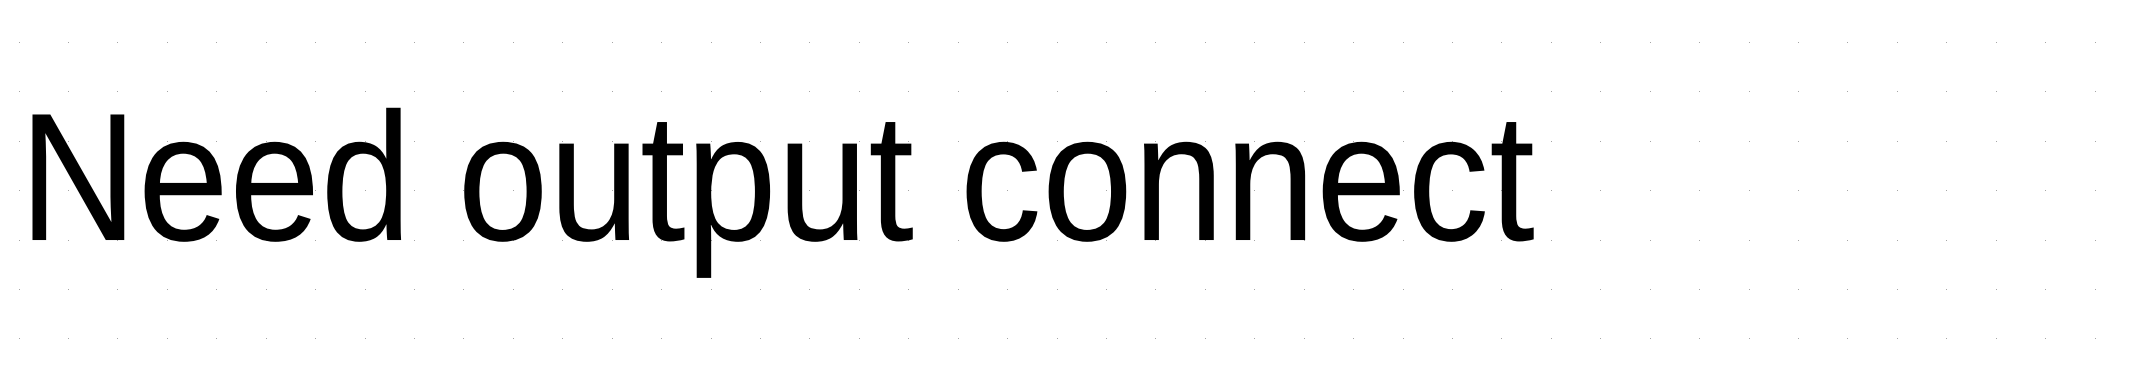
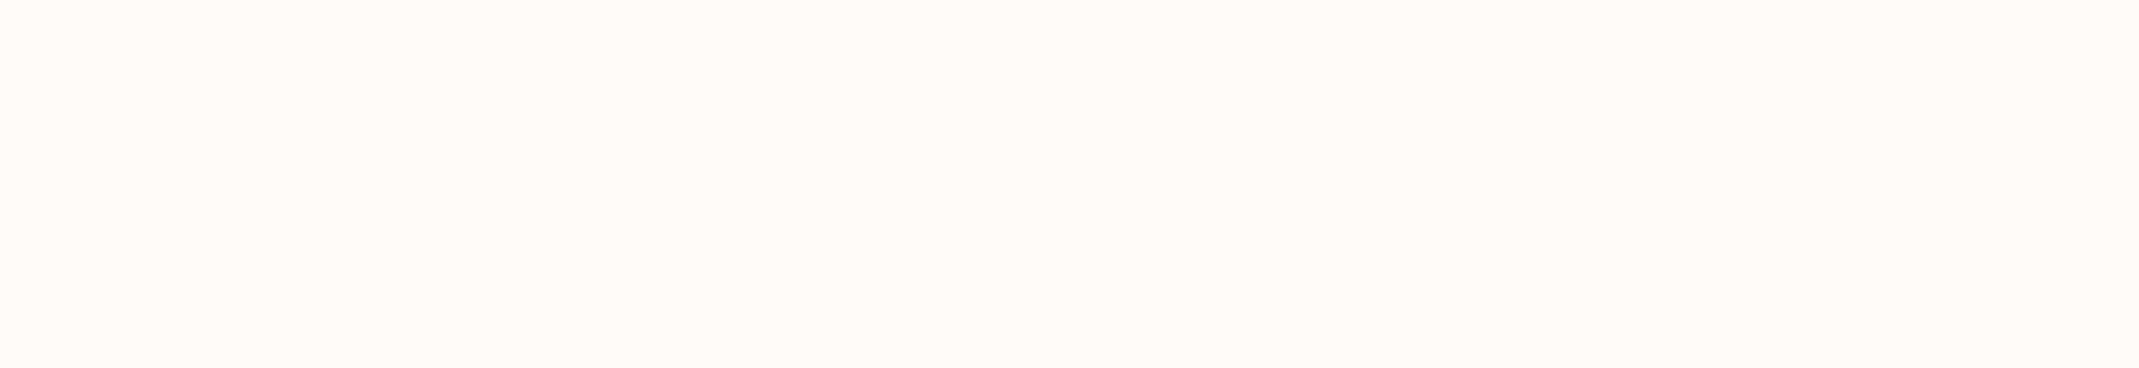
text: Need output connect (783, 192) -> none

